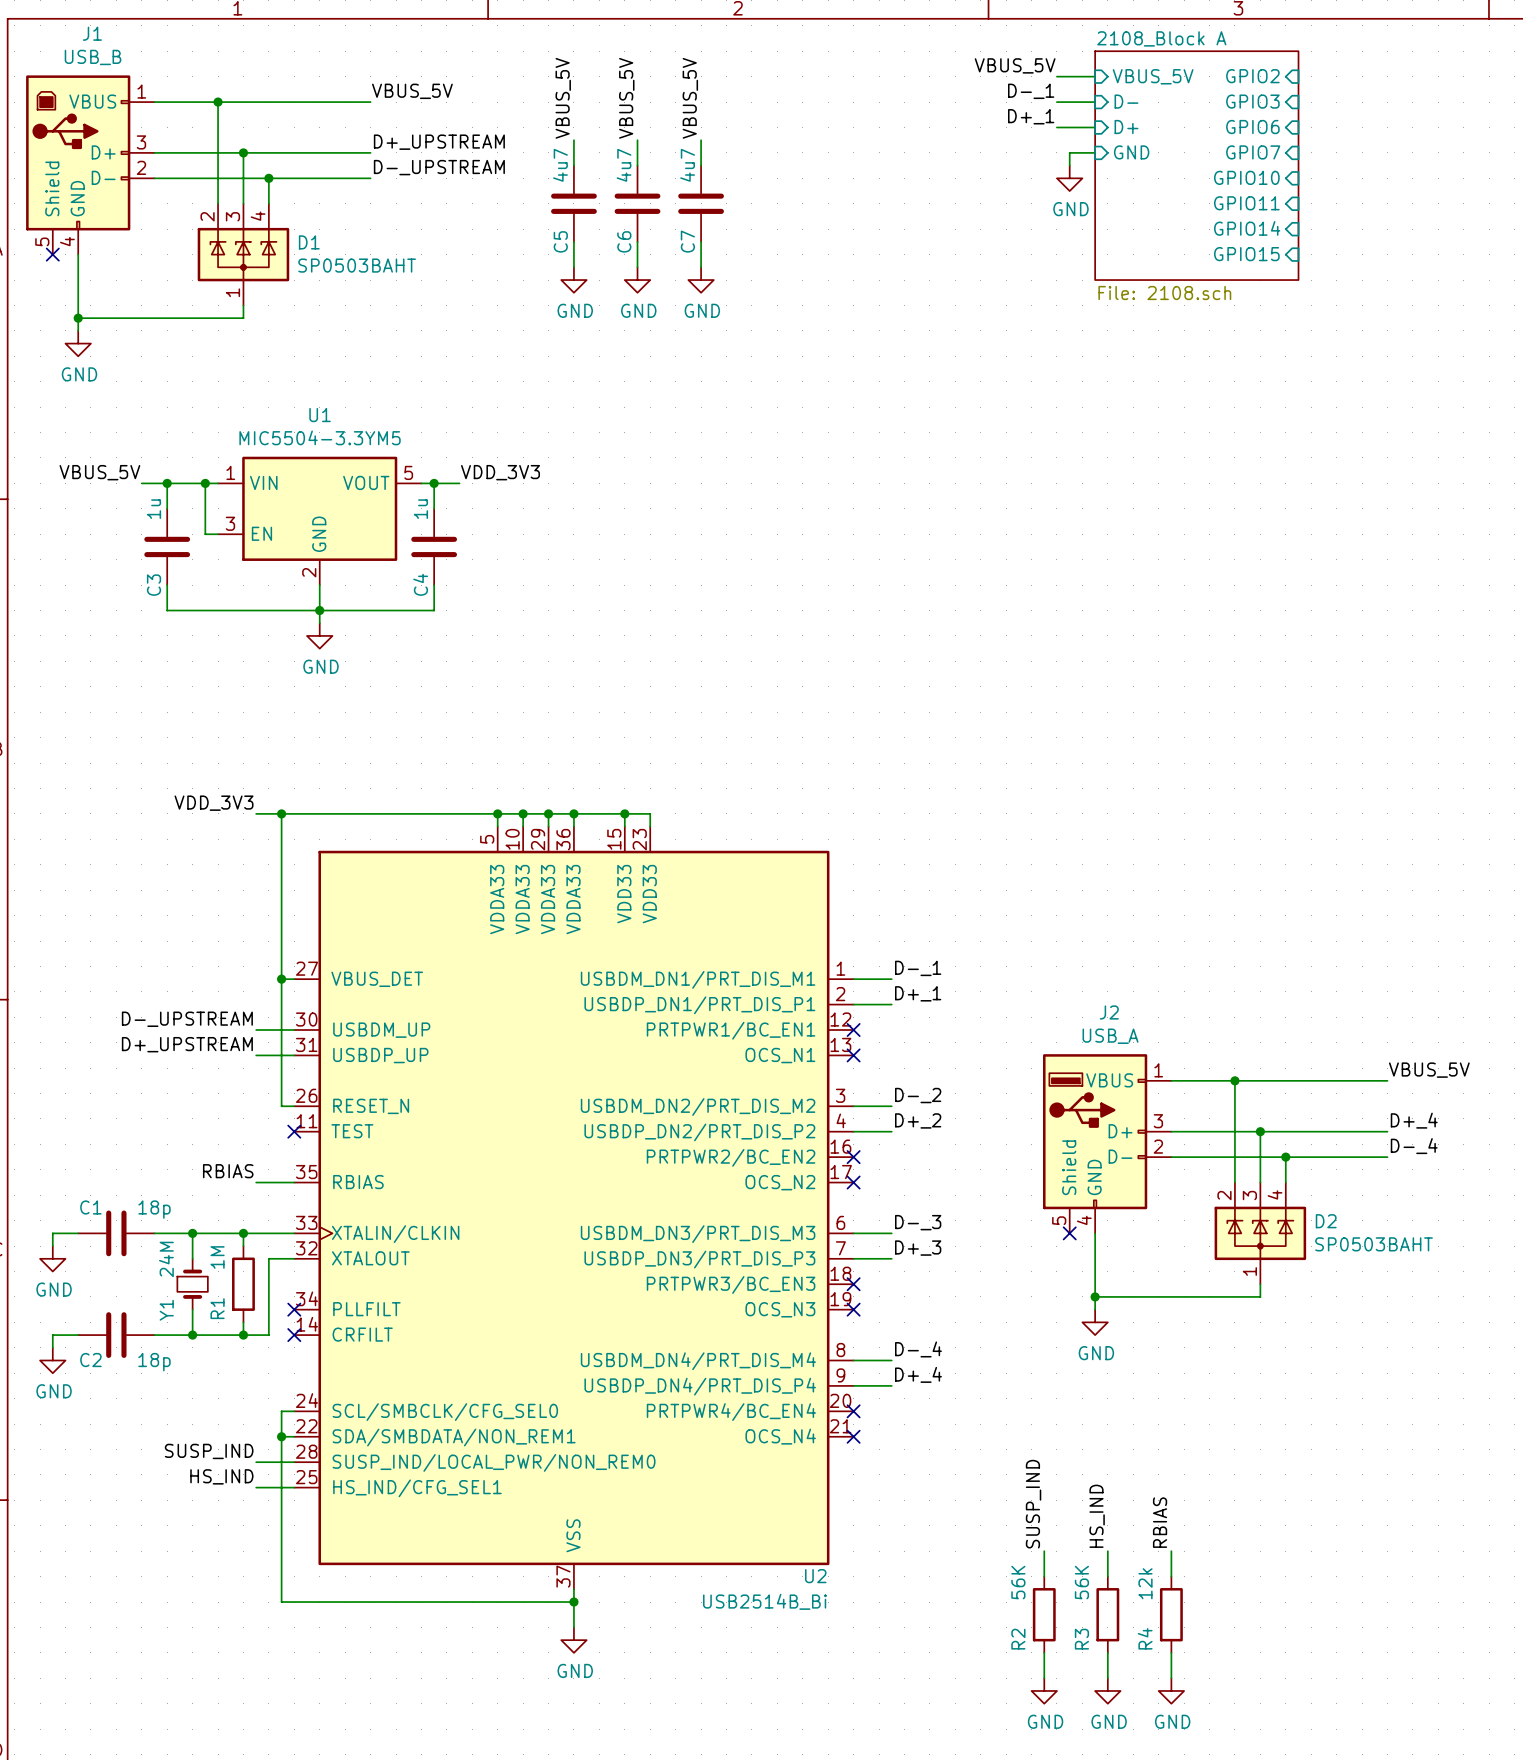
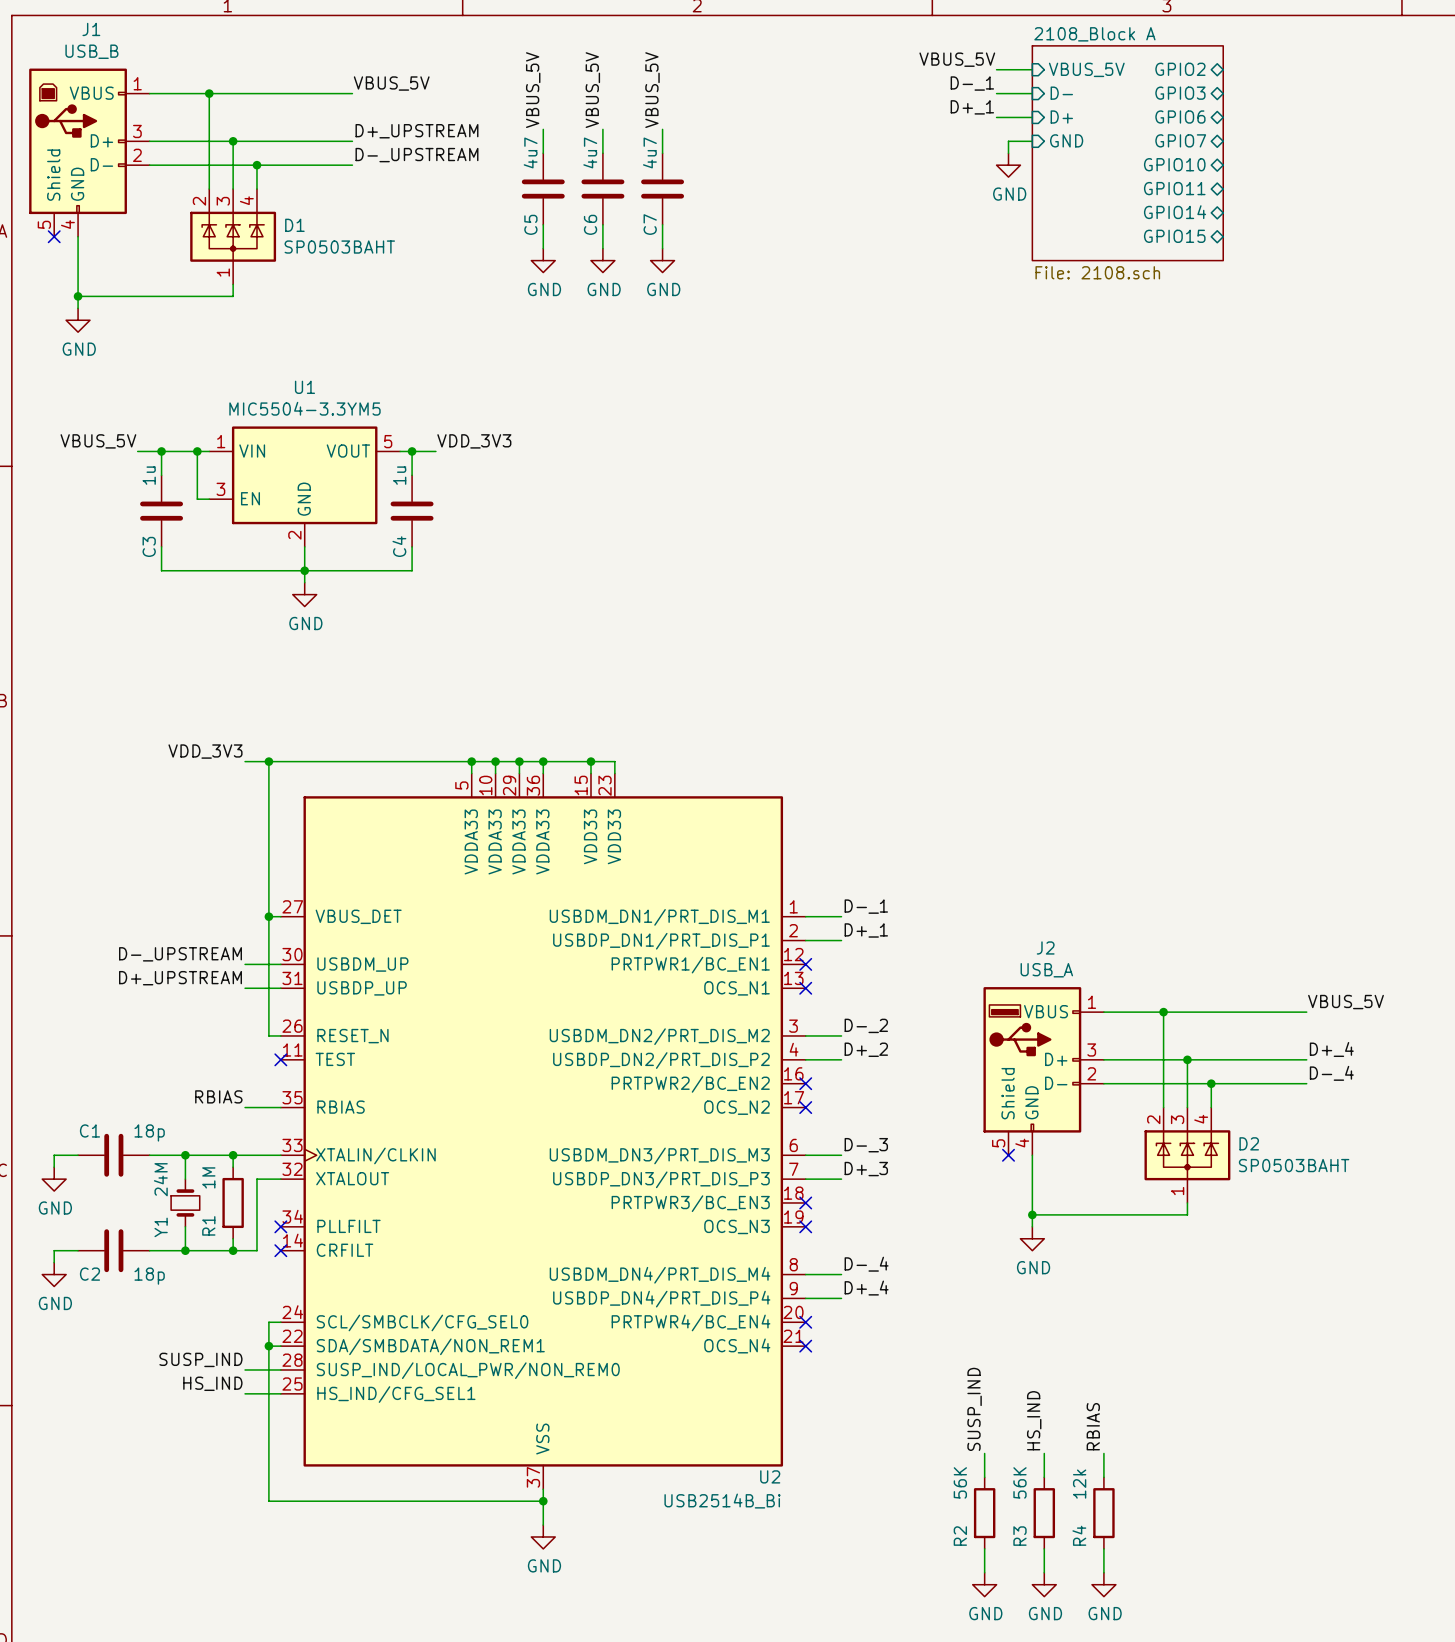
sheet pin shape: input (1252, 76) -> bidirectional (1180, 69)
sheet pin shape: input (1252, 101) -> bidirectional (1180, 93)
sheet pin shape: input (1252, 127) -> bidirectional (1180, 117)
sheet pin shape: input (1253, 152) -> bidirectional (1180, 140)
sheet pin shape: input (1246, 177) -> bidirectional (1174, 164)
sheet pin shape: input (1246, 203) -> bidirectional (1174, 188)
sheet pin shape: input (1247, 228) -> bidirectional (1175, 212)
sheet pin shape: input (1246, 254) -> bidirectional (1174, 236)

